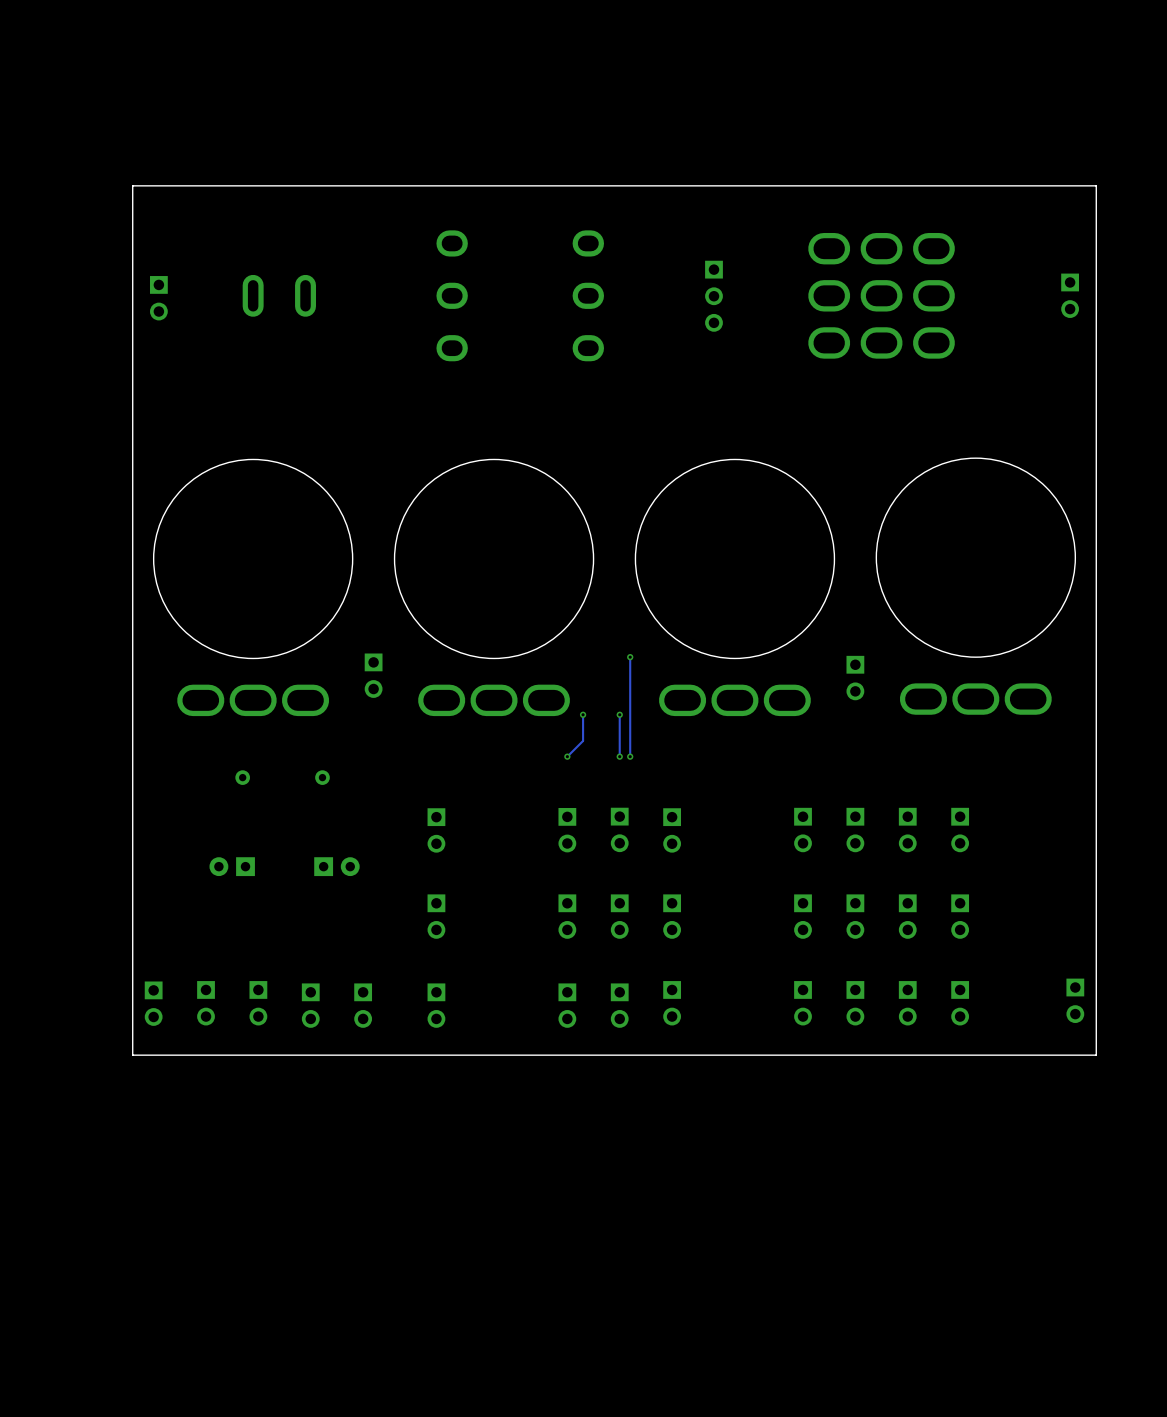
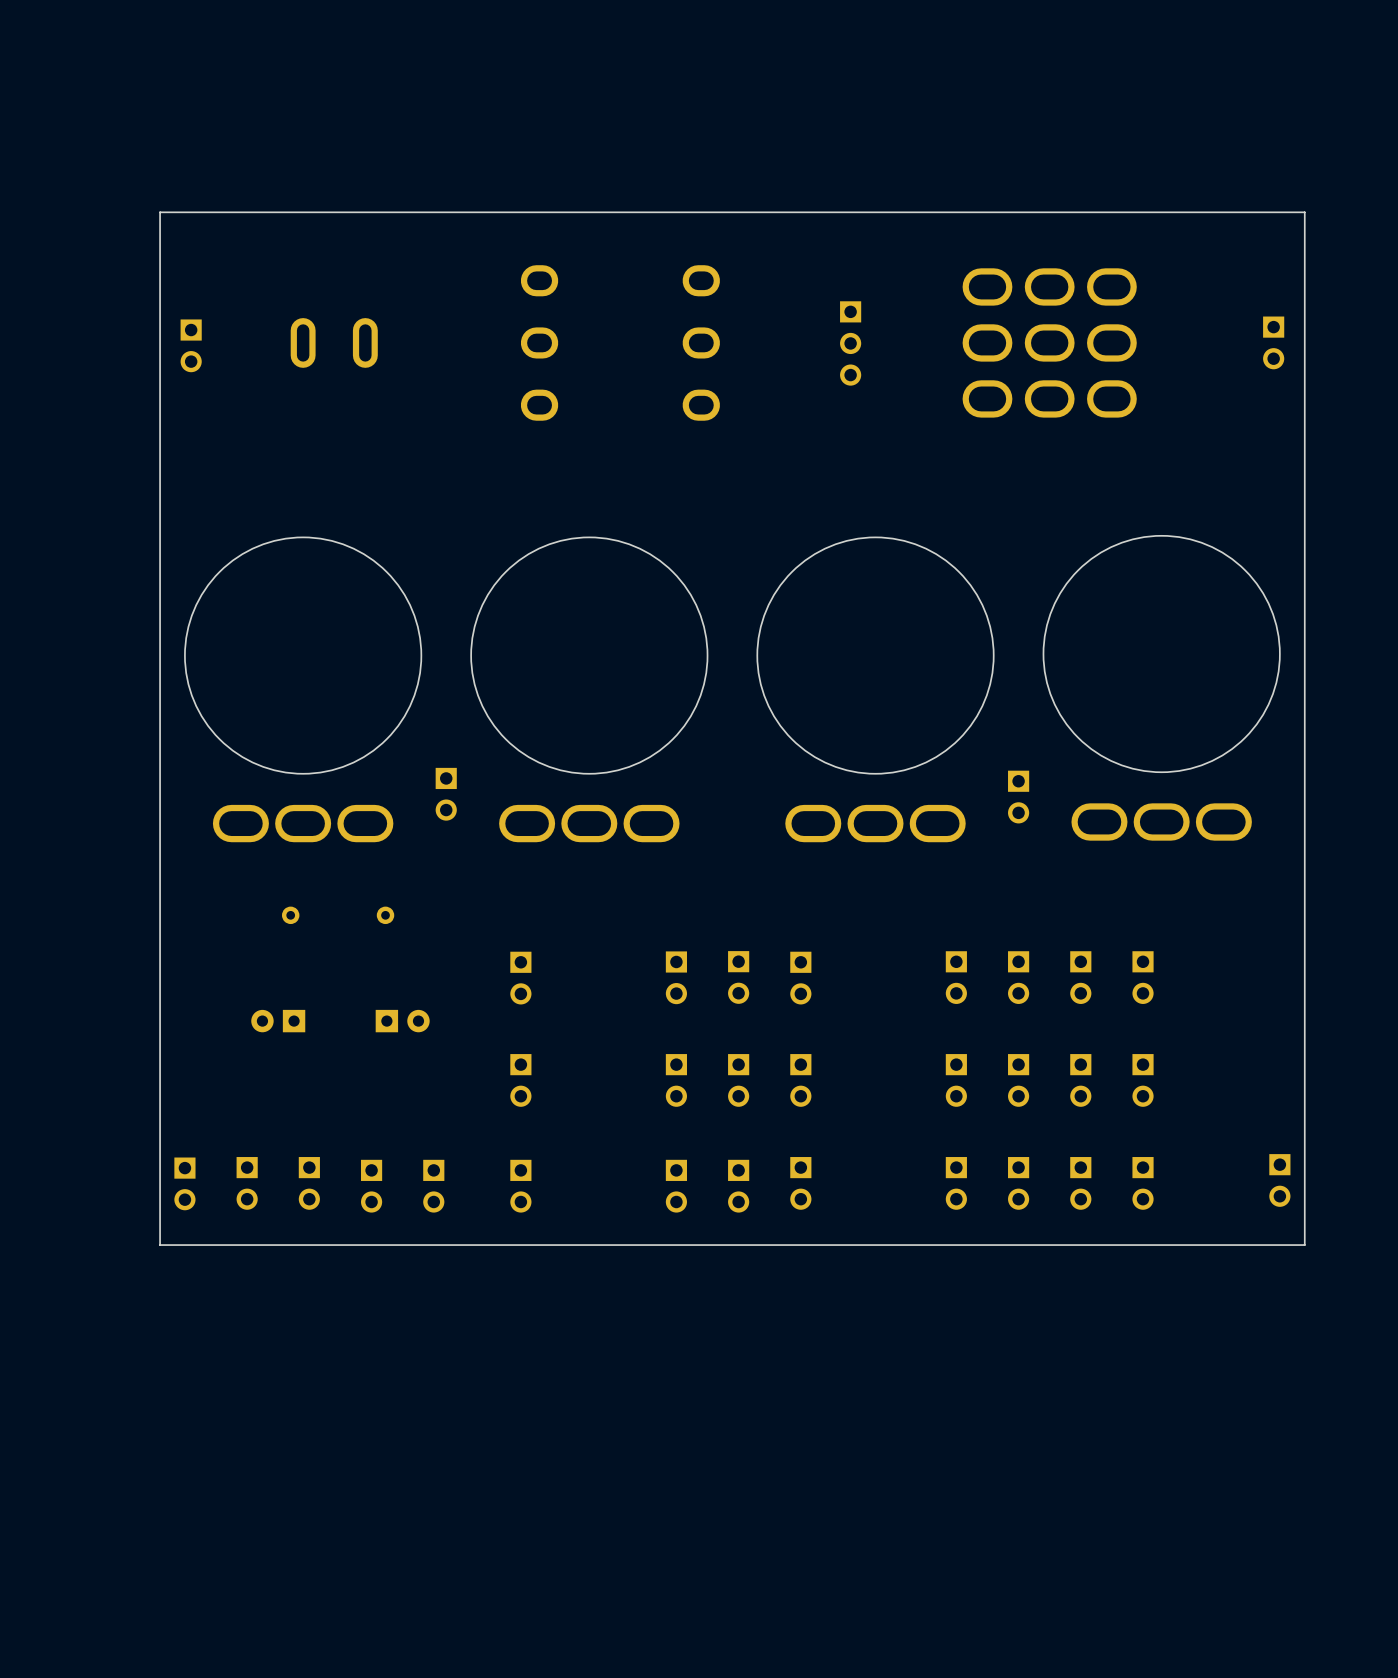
track: (630, 657) (630, 756) -> none
via: (630, 657) -> none
track: (583, 714) (583, 740) (567, 756) -> none
via: (583, 714) -> none
track: (619, 714) (619, 756) -> none
via: (619, 714) -> none
via: (567, 756) -> none
via: (619, 756) -> none
via: (630, 756) -> none

